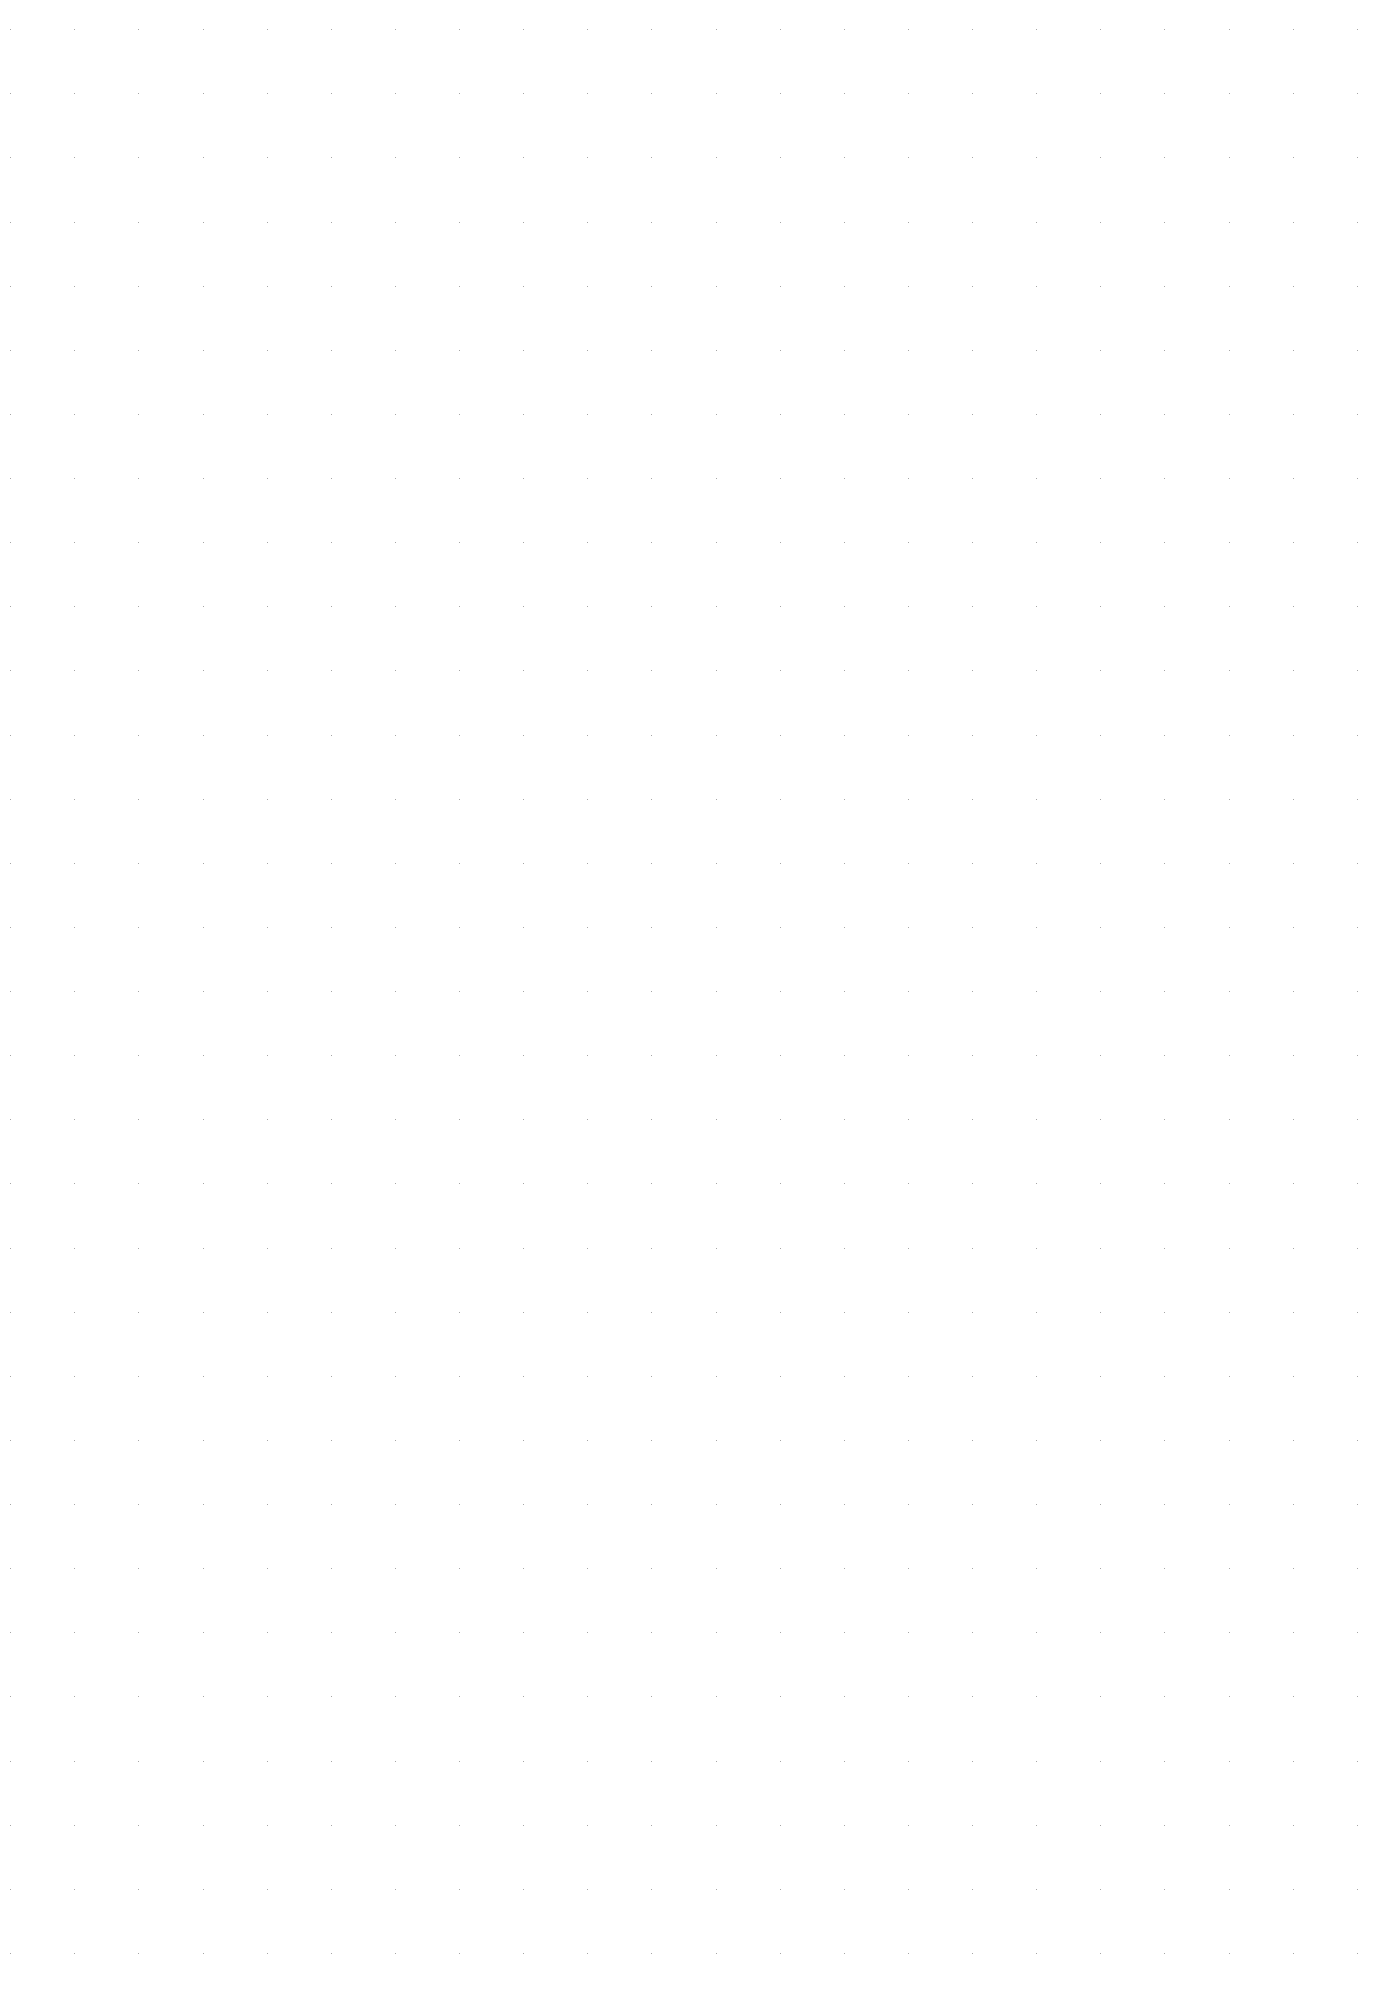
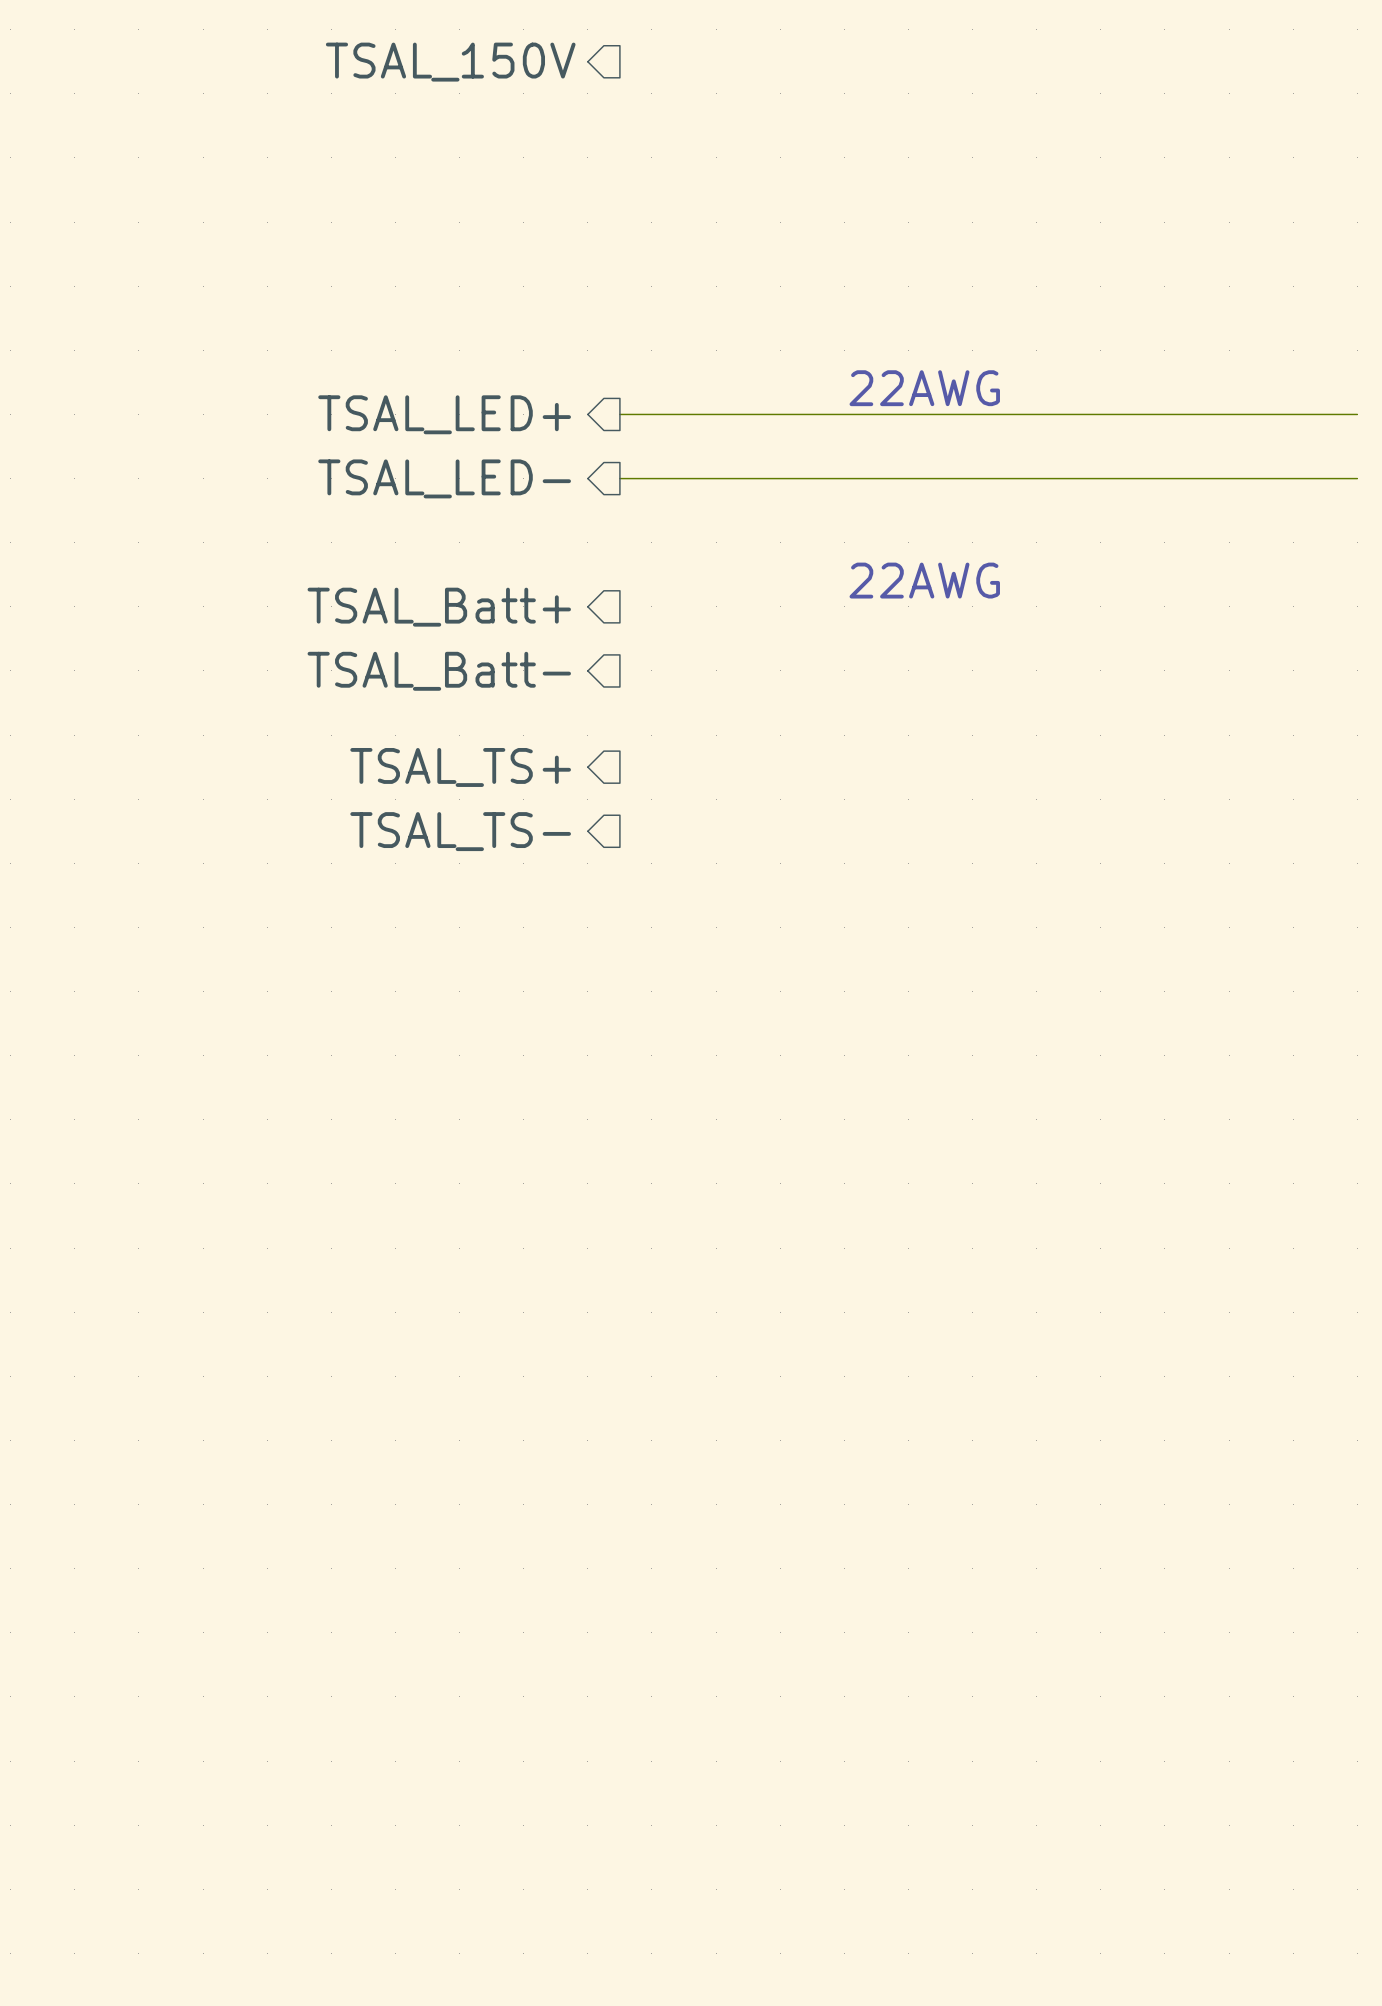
sheet pin: none -> TSAL_150V (450, 62)
text: none -> 22AWG (924, 388)
wire: none -> (619, 414) (1357, 414)
sheet pin: none -> TSAL_LED+ (444, 414)
wire: none -> (619, 478) (1357, 478)
sheet pin: none -> TSAL_LED- (444, 478)
text: none -> 22AWG (924, 580)
sheet pin: none -> TSAL_Batt+ (439, 607)
sheet pin: none -> TSAL_Batt- (439, 671)
sheet pin: none -> TSAL_TS+ (460, 767)
sheet pin: none -> TSAL_TS- (460, 831)

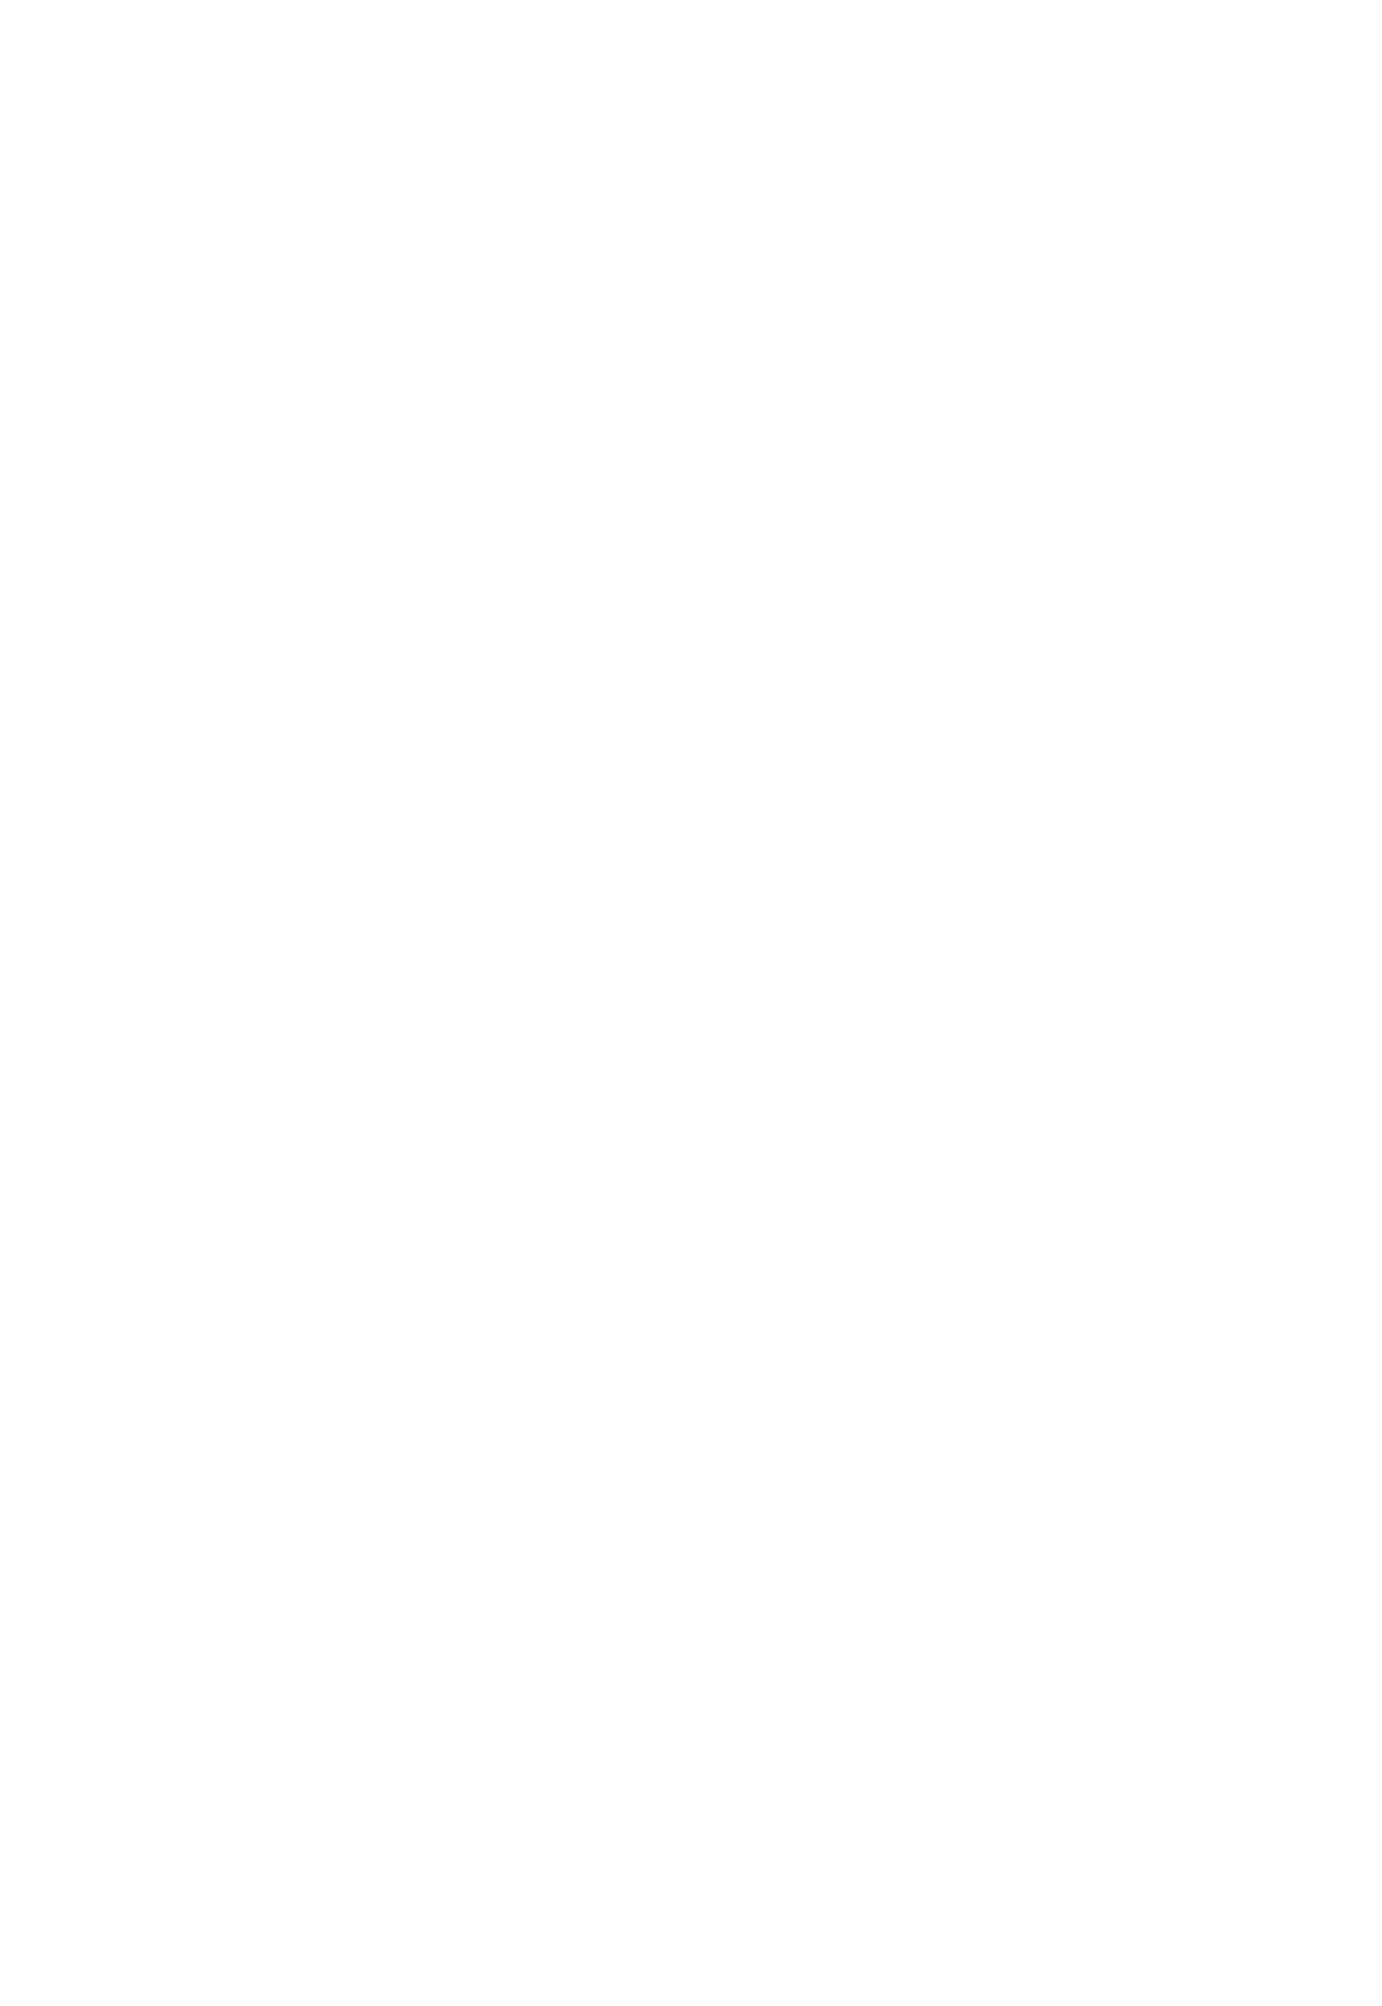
sheet pin: TSAL_150V (450, 62) -> none
text: 22AWG (924, 388) -> none
sheet pin: TSAL_LED+ (444, 414) -> none
wire: (619, 414) (1357, 414) -> none
sheet pin: TSAL_LED- (444, 478) -> none
wire: (619, 478) (1357, 478) -> none
text: 22AWG (924, 580) -> none
sheet pin: TSAL_Batt+ (439, 607) -> none
sheet pin: TSAL_Batt- (439, 671) -> none
sheet pin: TSAL_TS+ (460, 767) -> none
sheet pin: TSAL_TS- (460, 831) -> none

